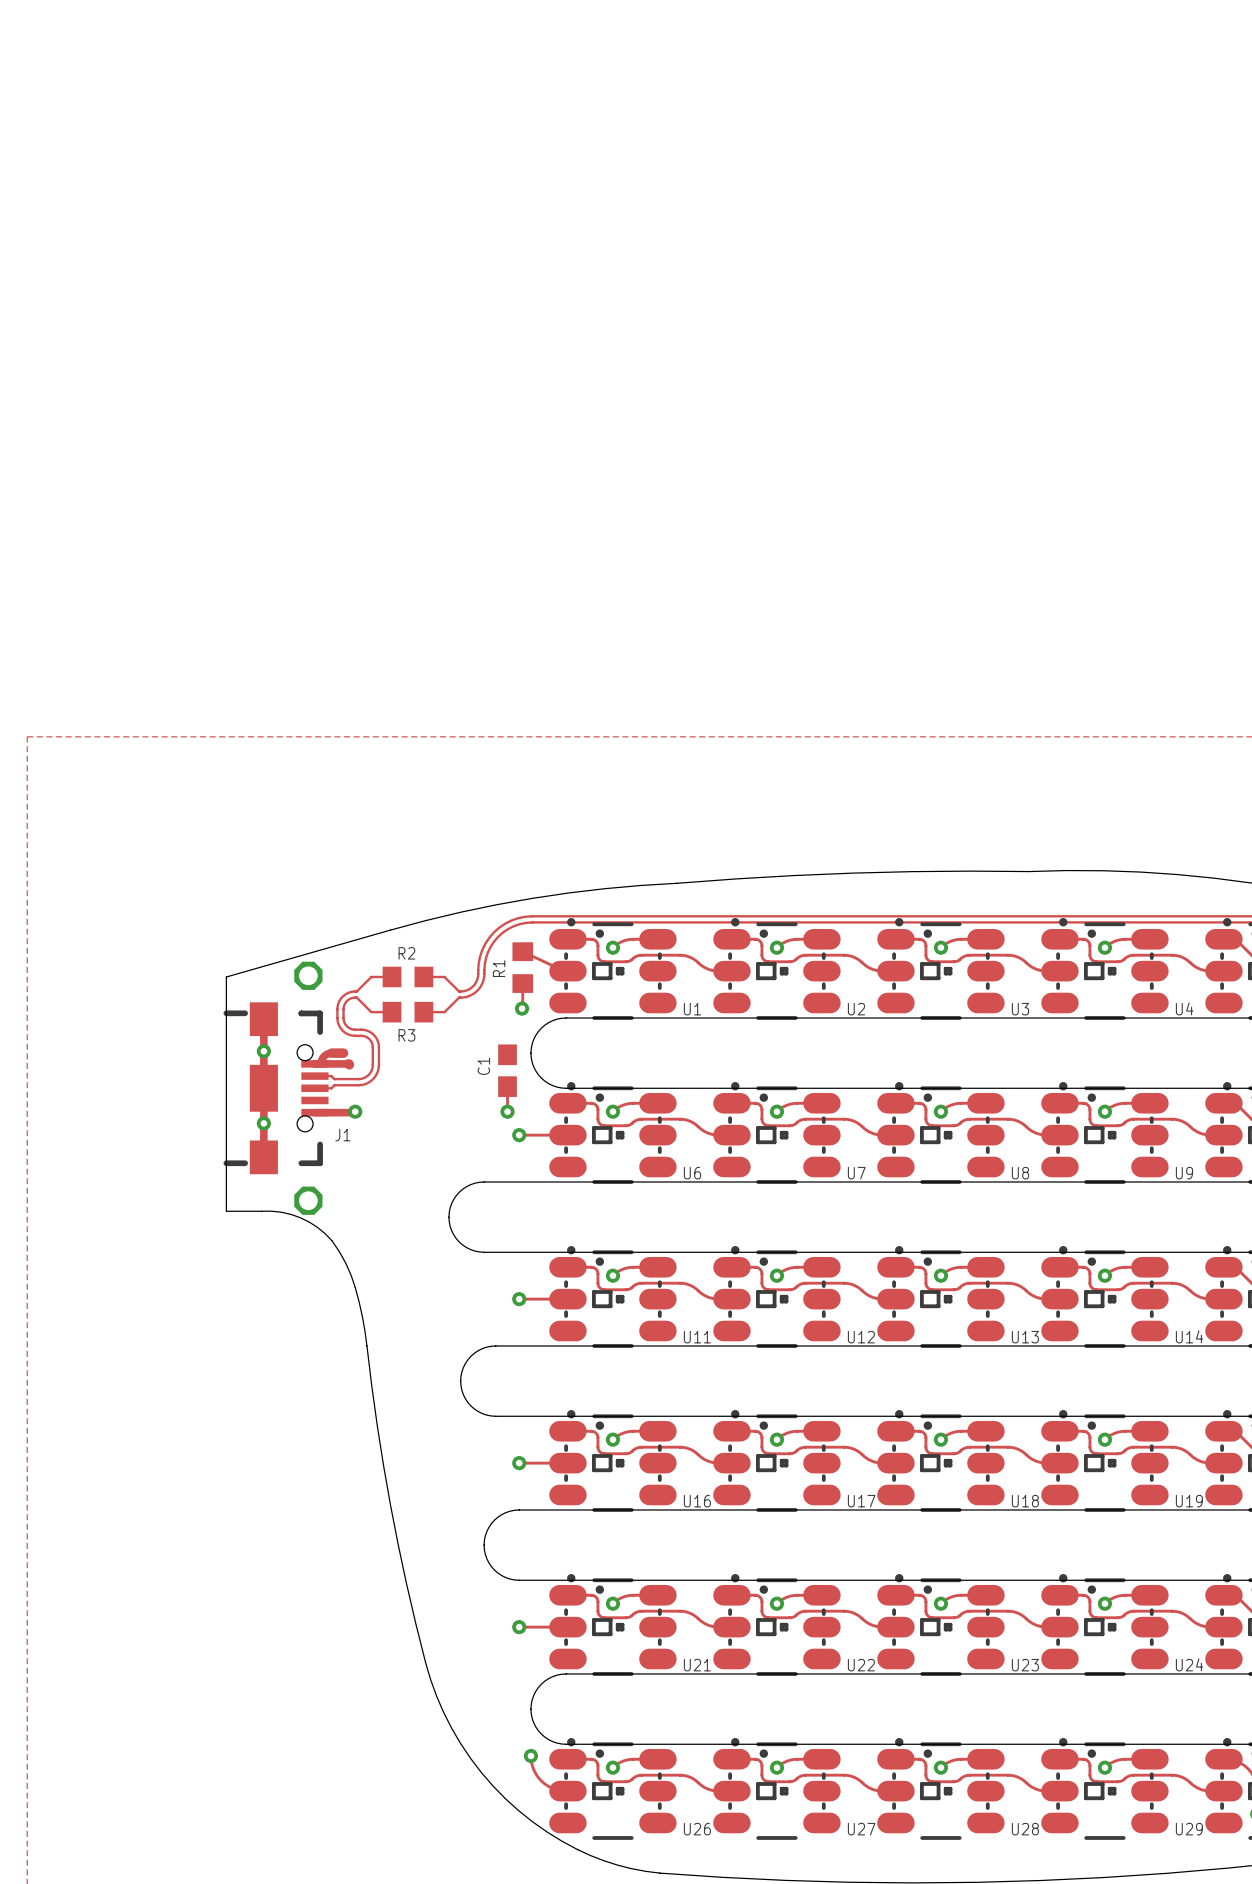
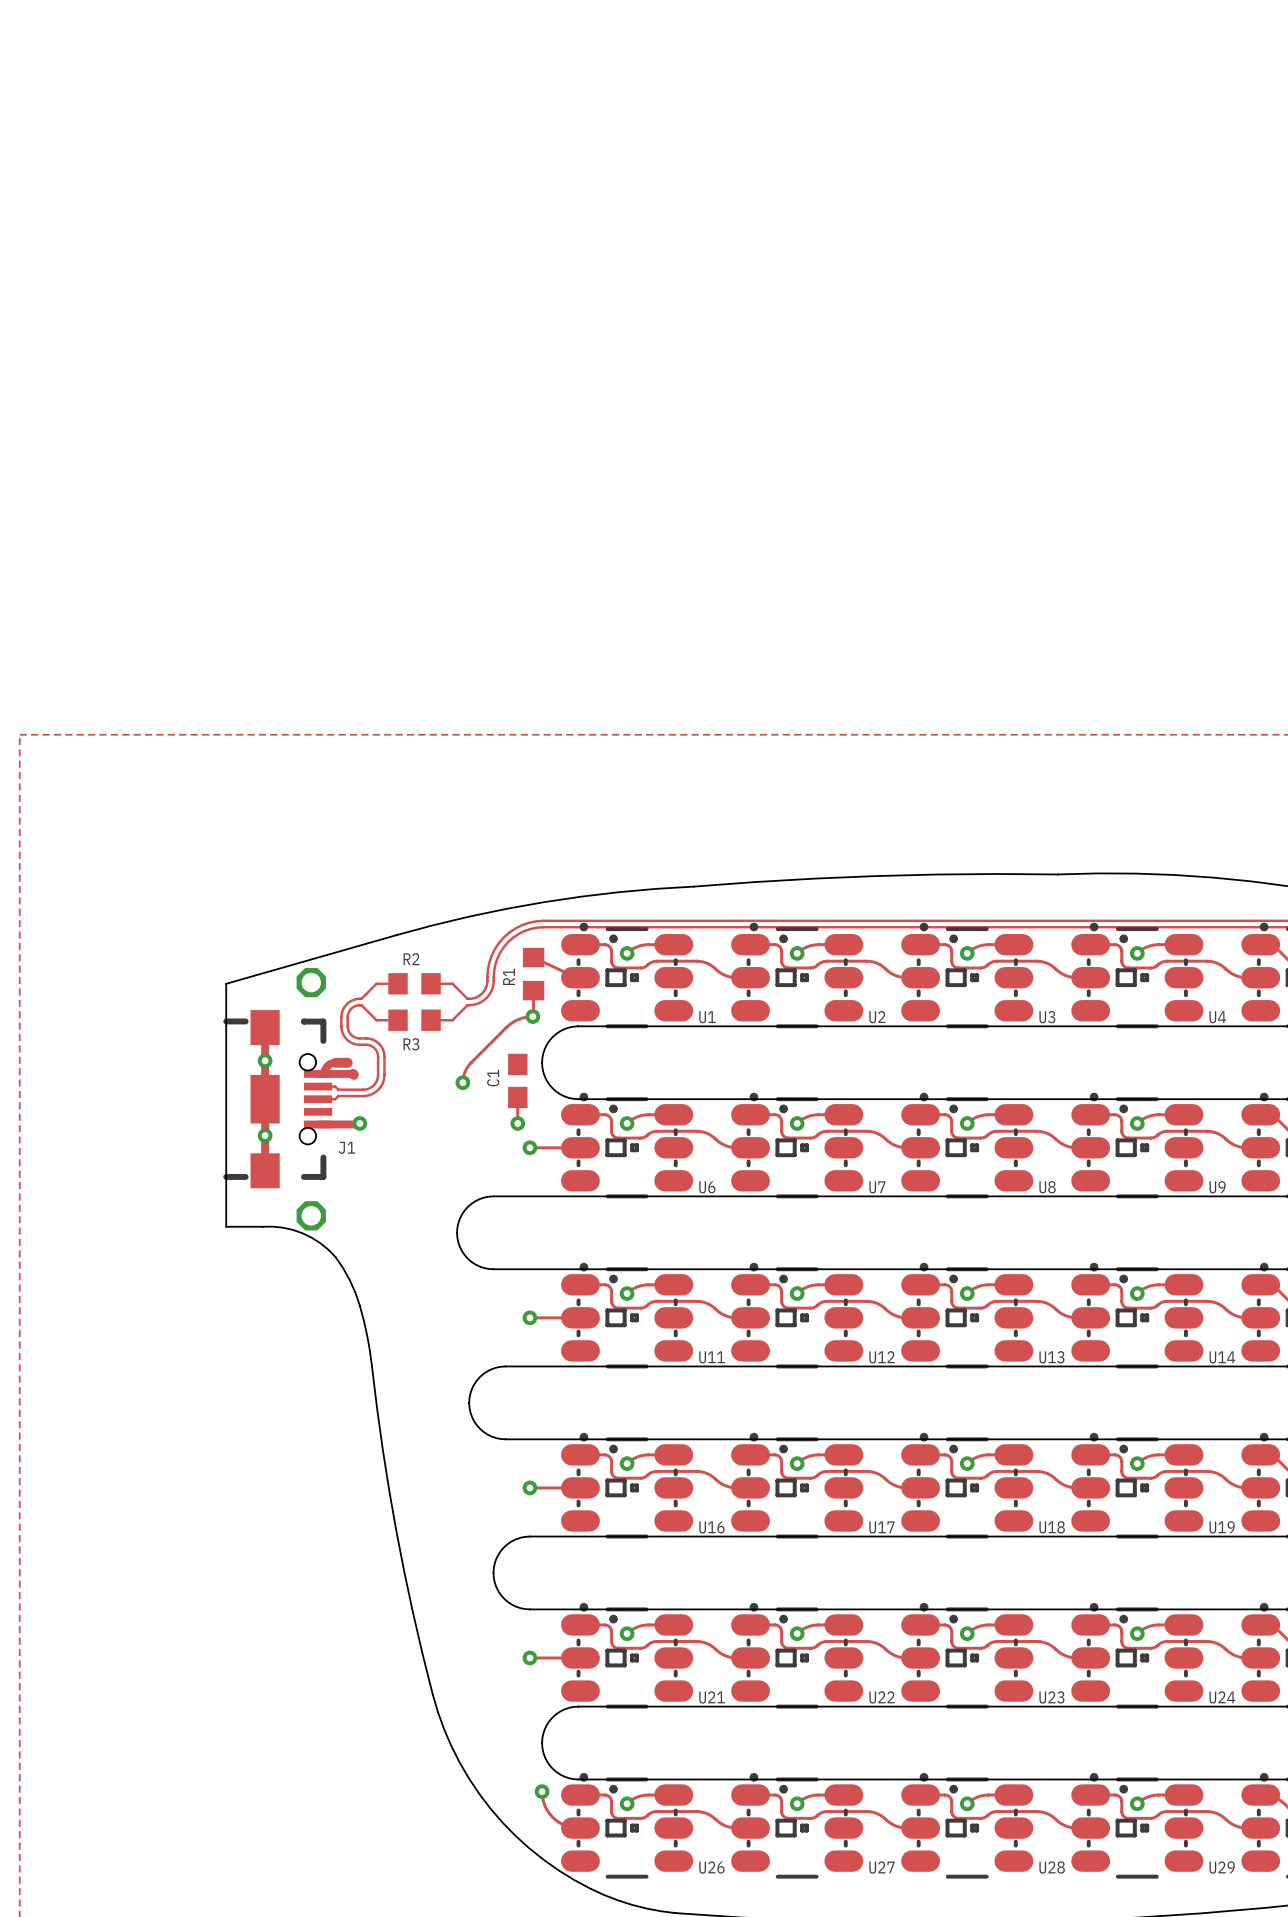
track: none -> (532, 1016) (518, 1019) (506, 1027) (468, 1065) (462, 1082)
via: none -> (462, 1082)

